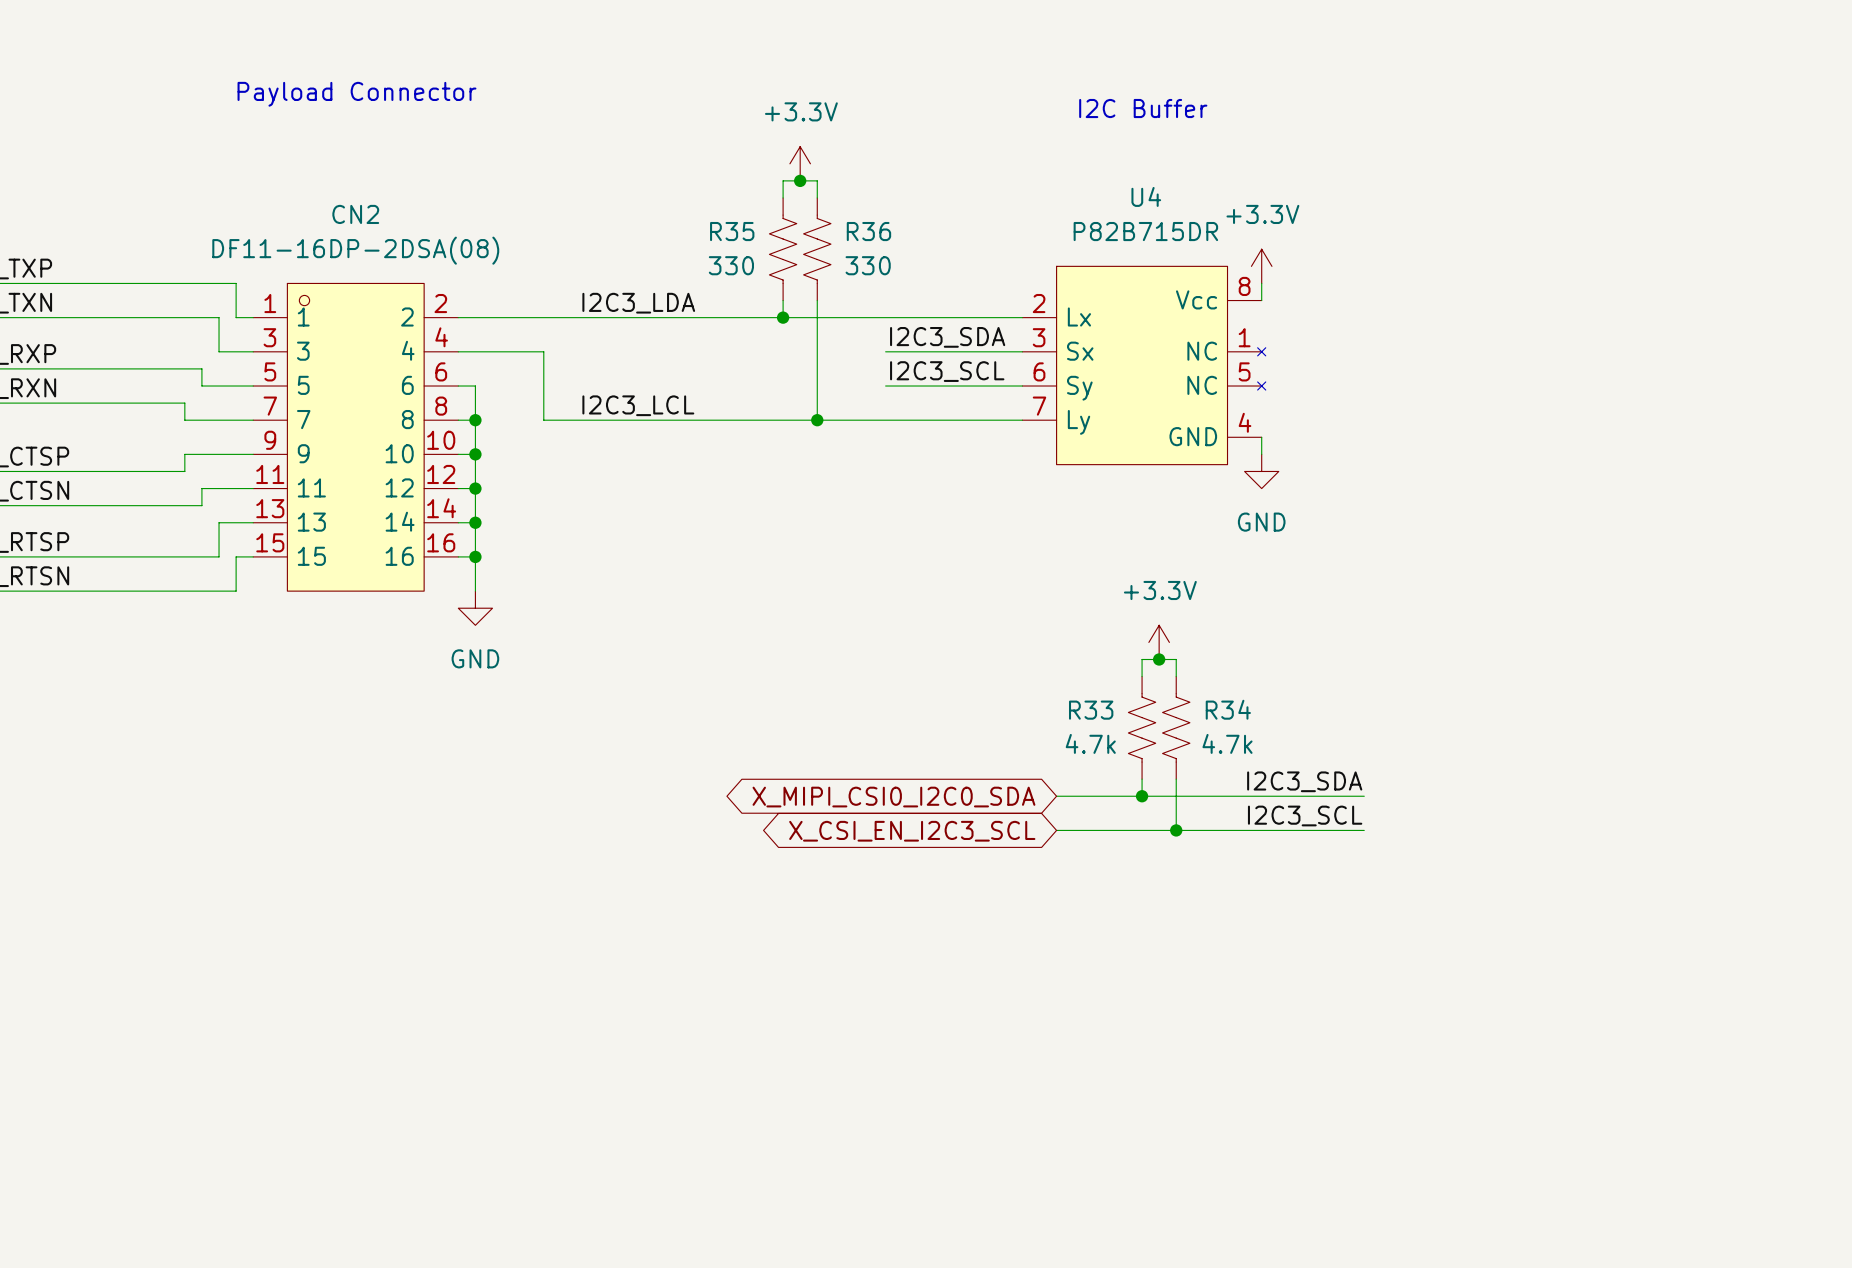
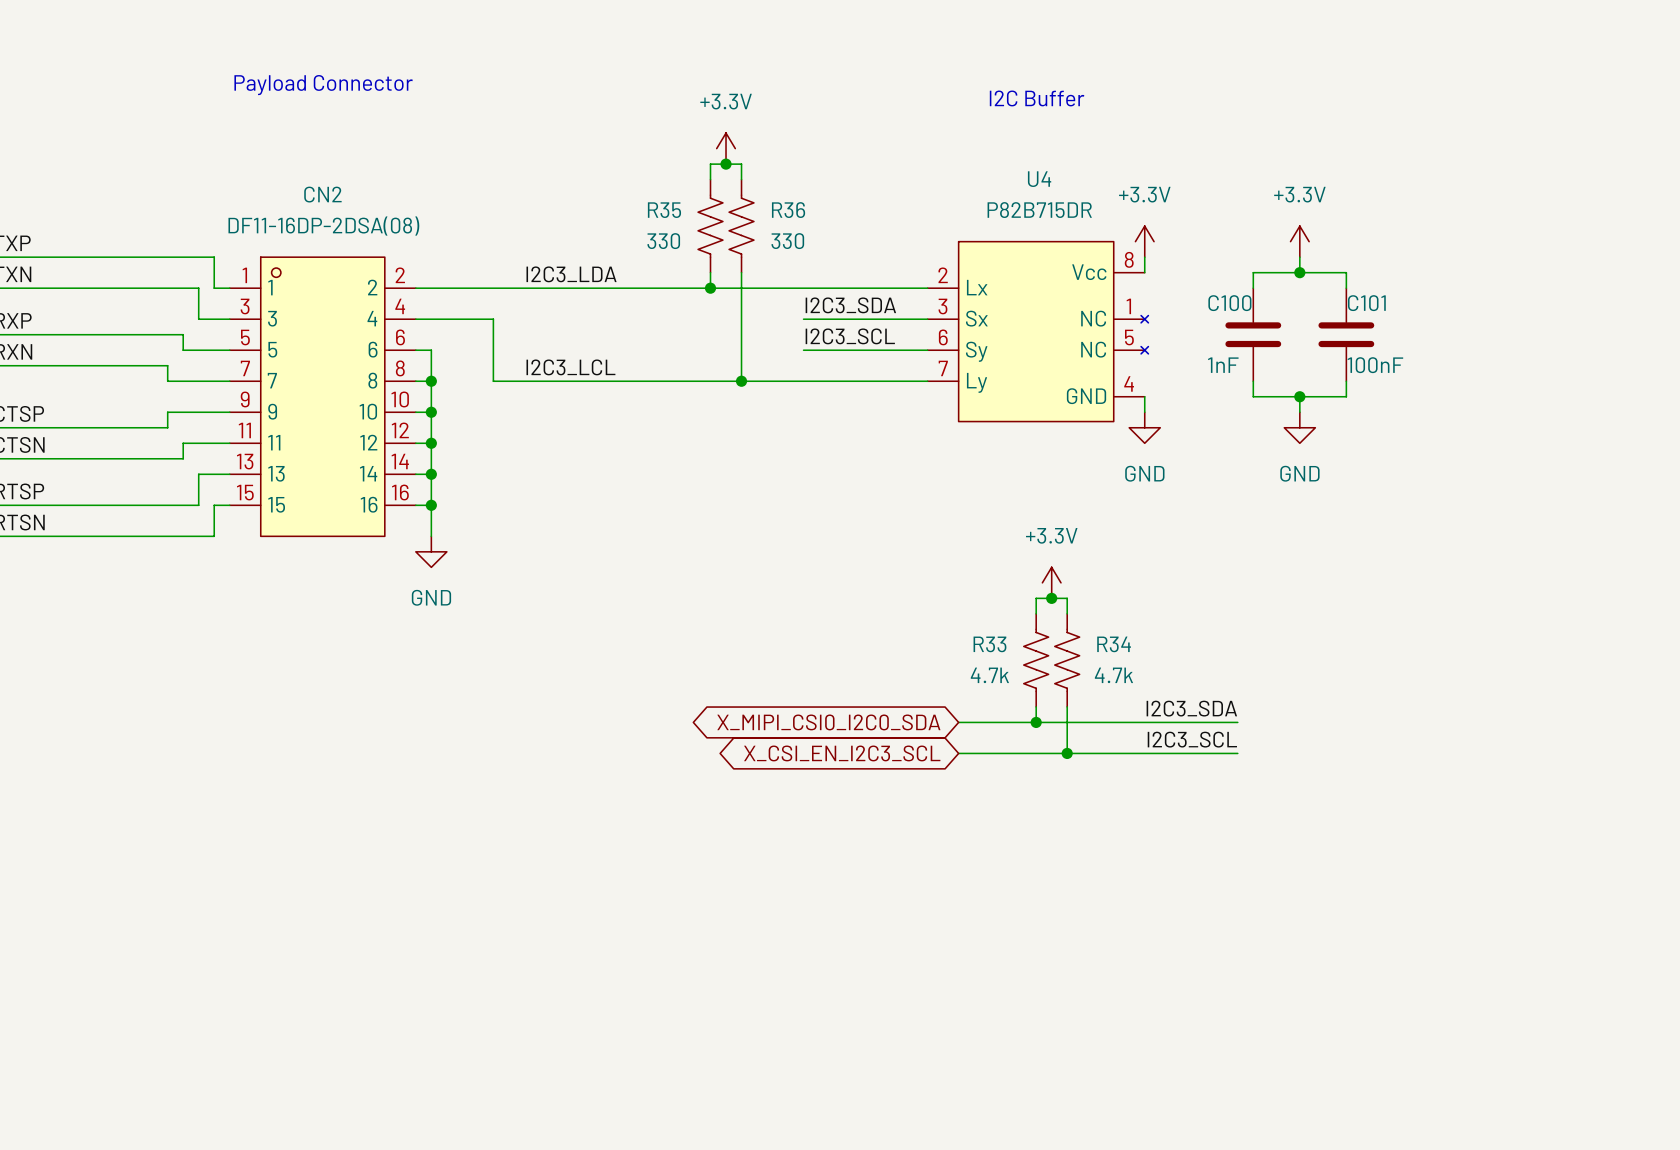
power symbol: none -> +3.3V (1299, 241)
wire: none -> (1299, 257) (1299, 272)
junction: none -> (1299, 272)
wire: none -> (1253, 288) (1253, 272) (1346, 272) (1346, 288)
C100: none -> 1nF (1253, 334)
C101: none -> 100nF (1346, 334)
wire: none -> (1253, 381) (1253, 396) (1346, 396) (1346, 381)
wire: none -> (1299, 396) (1299, 412)
junction: none -> (1299, 396)
power symbol: none -> GND (1299, 427)

